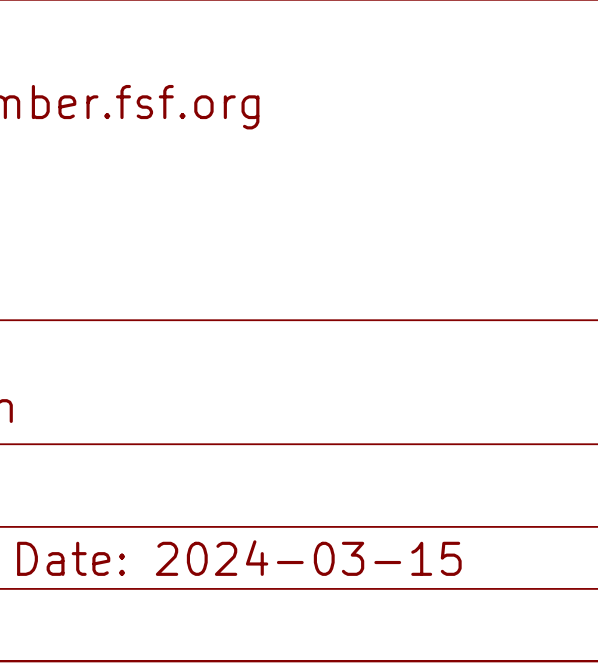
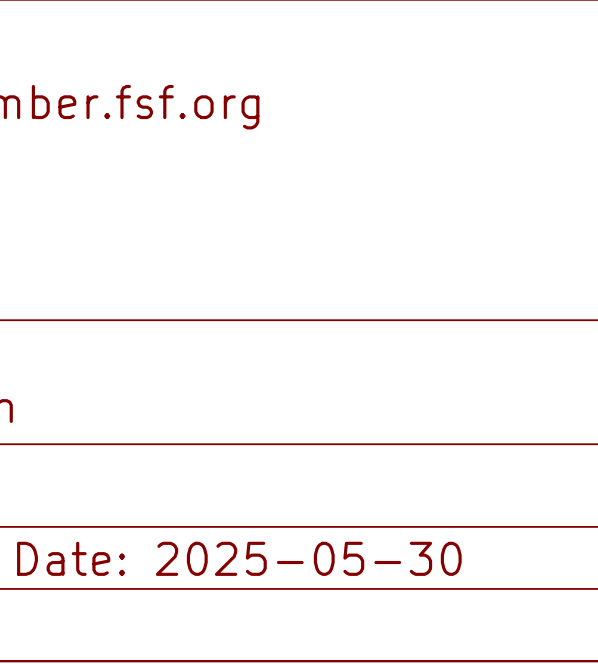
title block: Date: 2024-03-15 (239, 558) -> Date: 2025-05-30 (239, 558)

